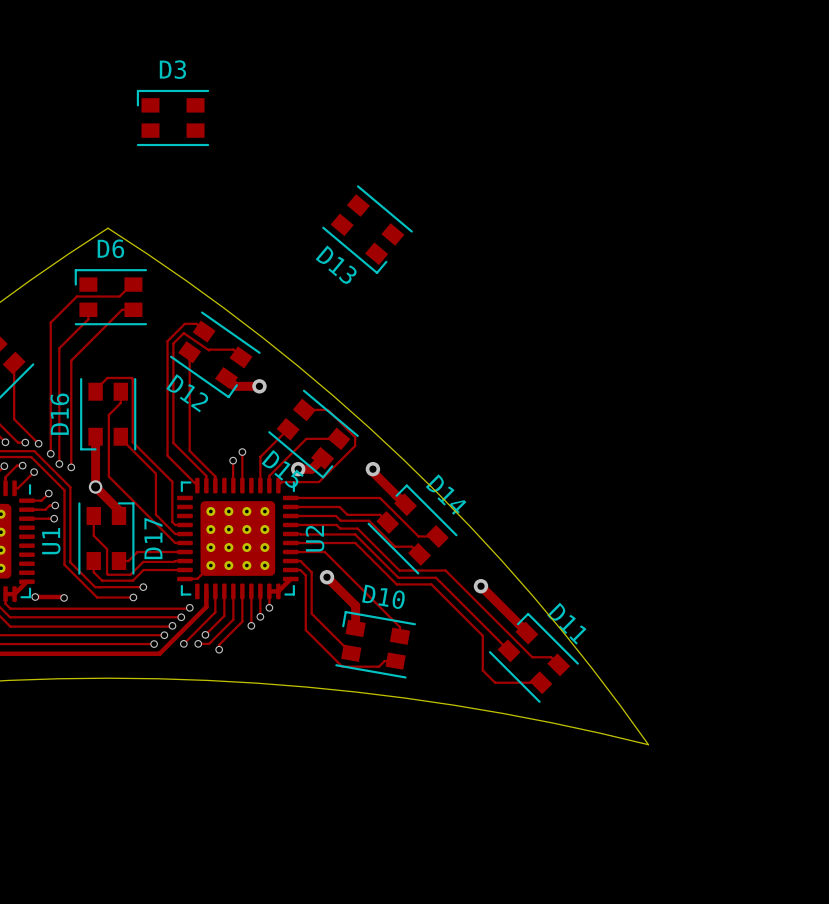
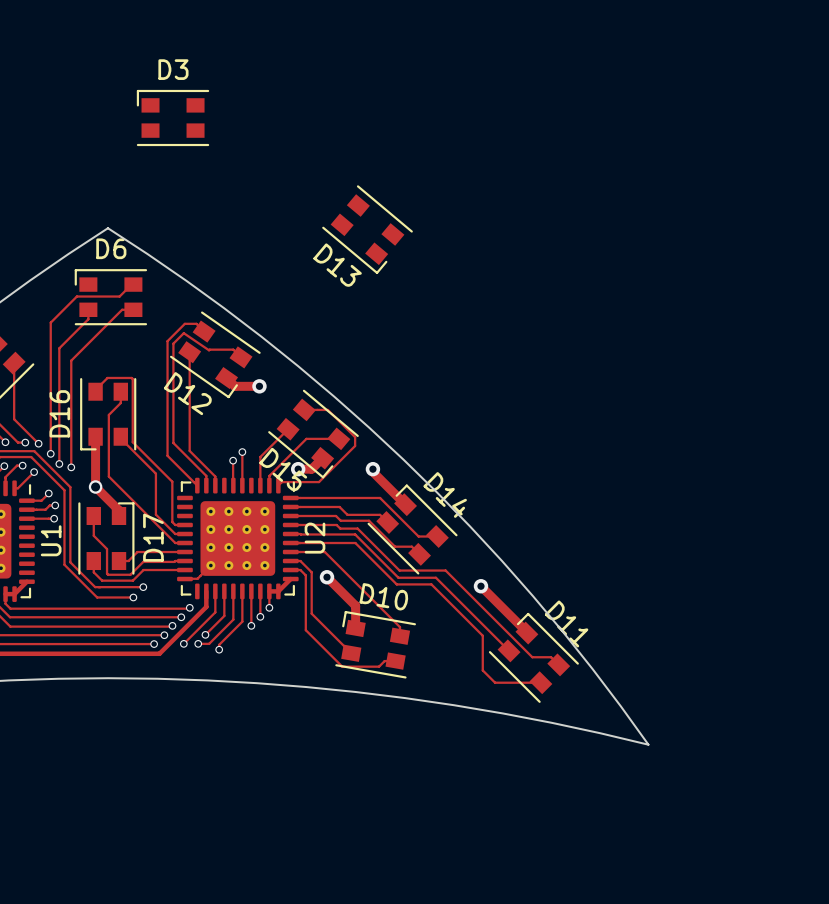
track: (35, 597) (64, 597) -> none
via: (35, 597) -> none
via: (64, 597) -> none

